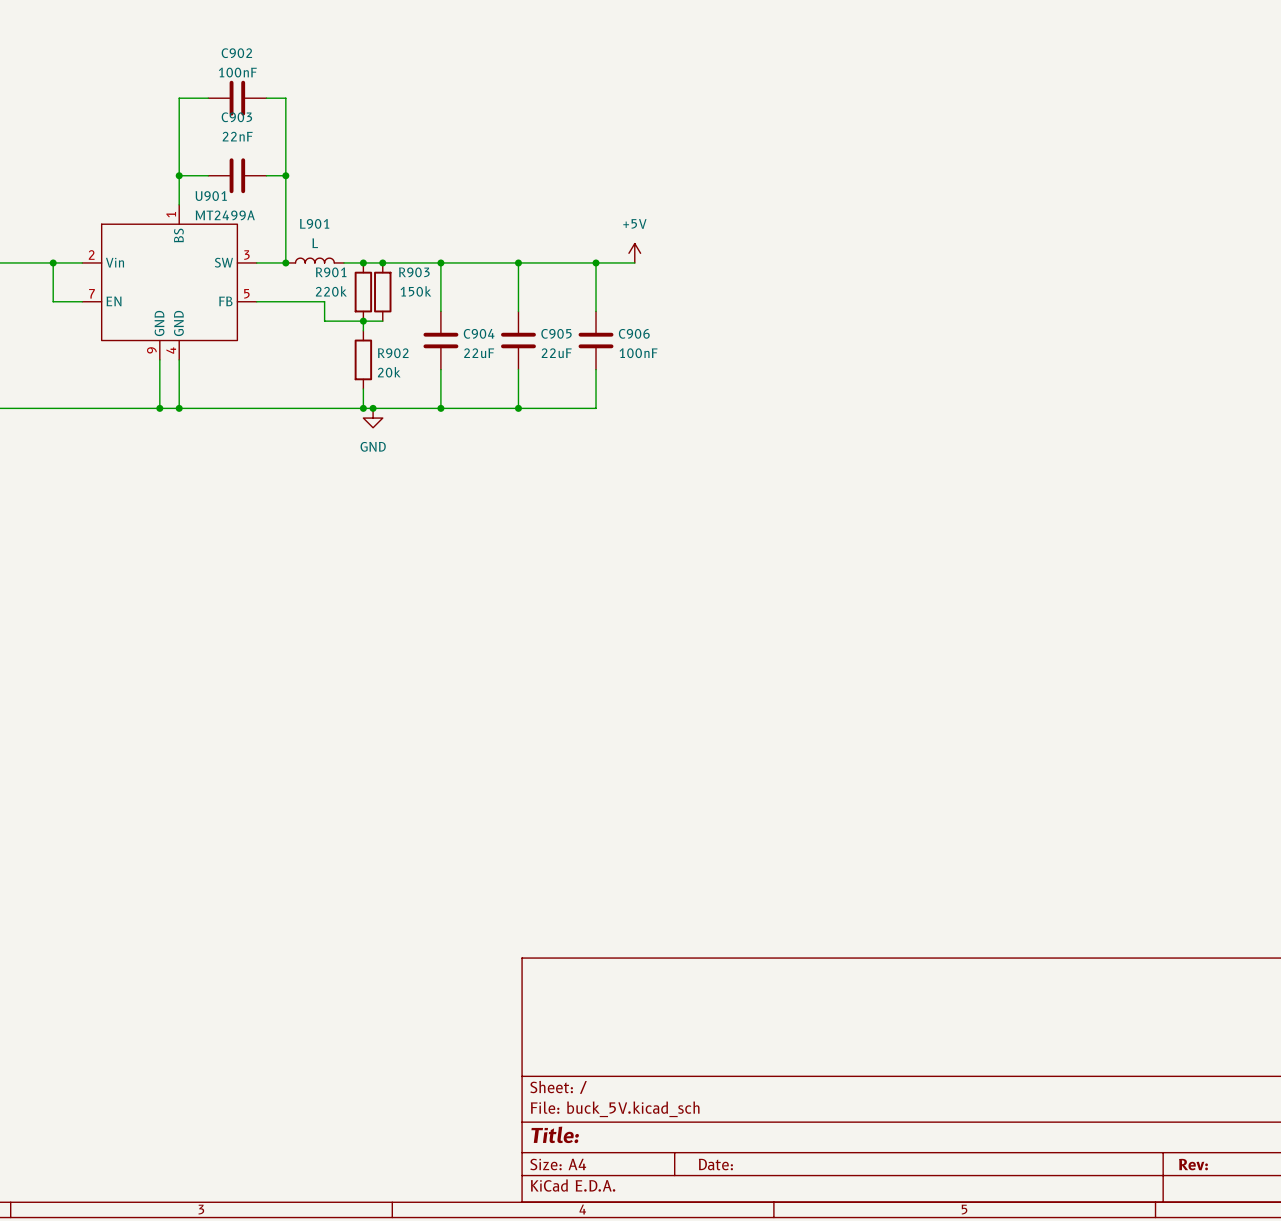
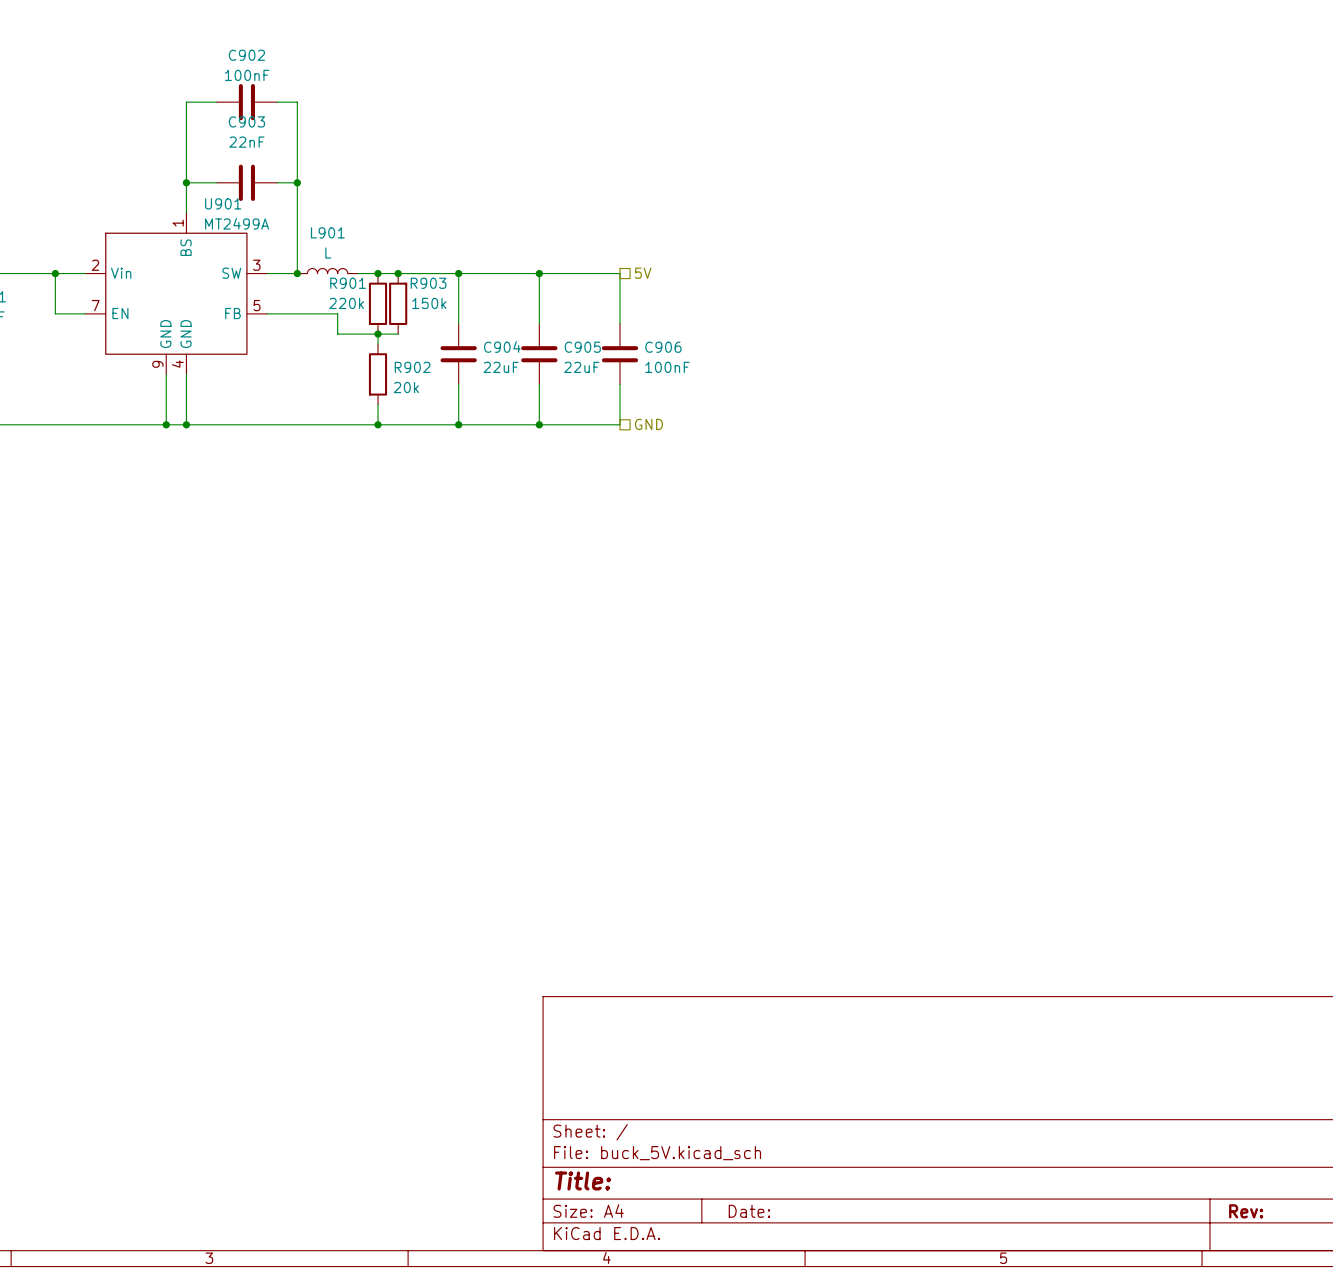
power symbol: +5V (634, 253) -> none
wire: (596, 262) (634, 262) -> none
junction: (596, 262) -> none
hierarchical label: none -> 5V (643, 273)
junction: (373, 408) -> none
hierarchical label: none -> GND (648, 424)
power symbol: GND (373, 418) -> none

